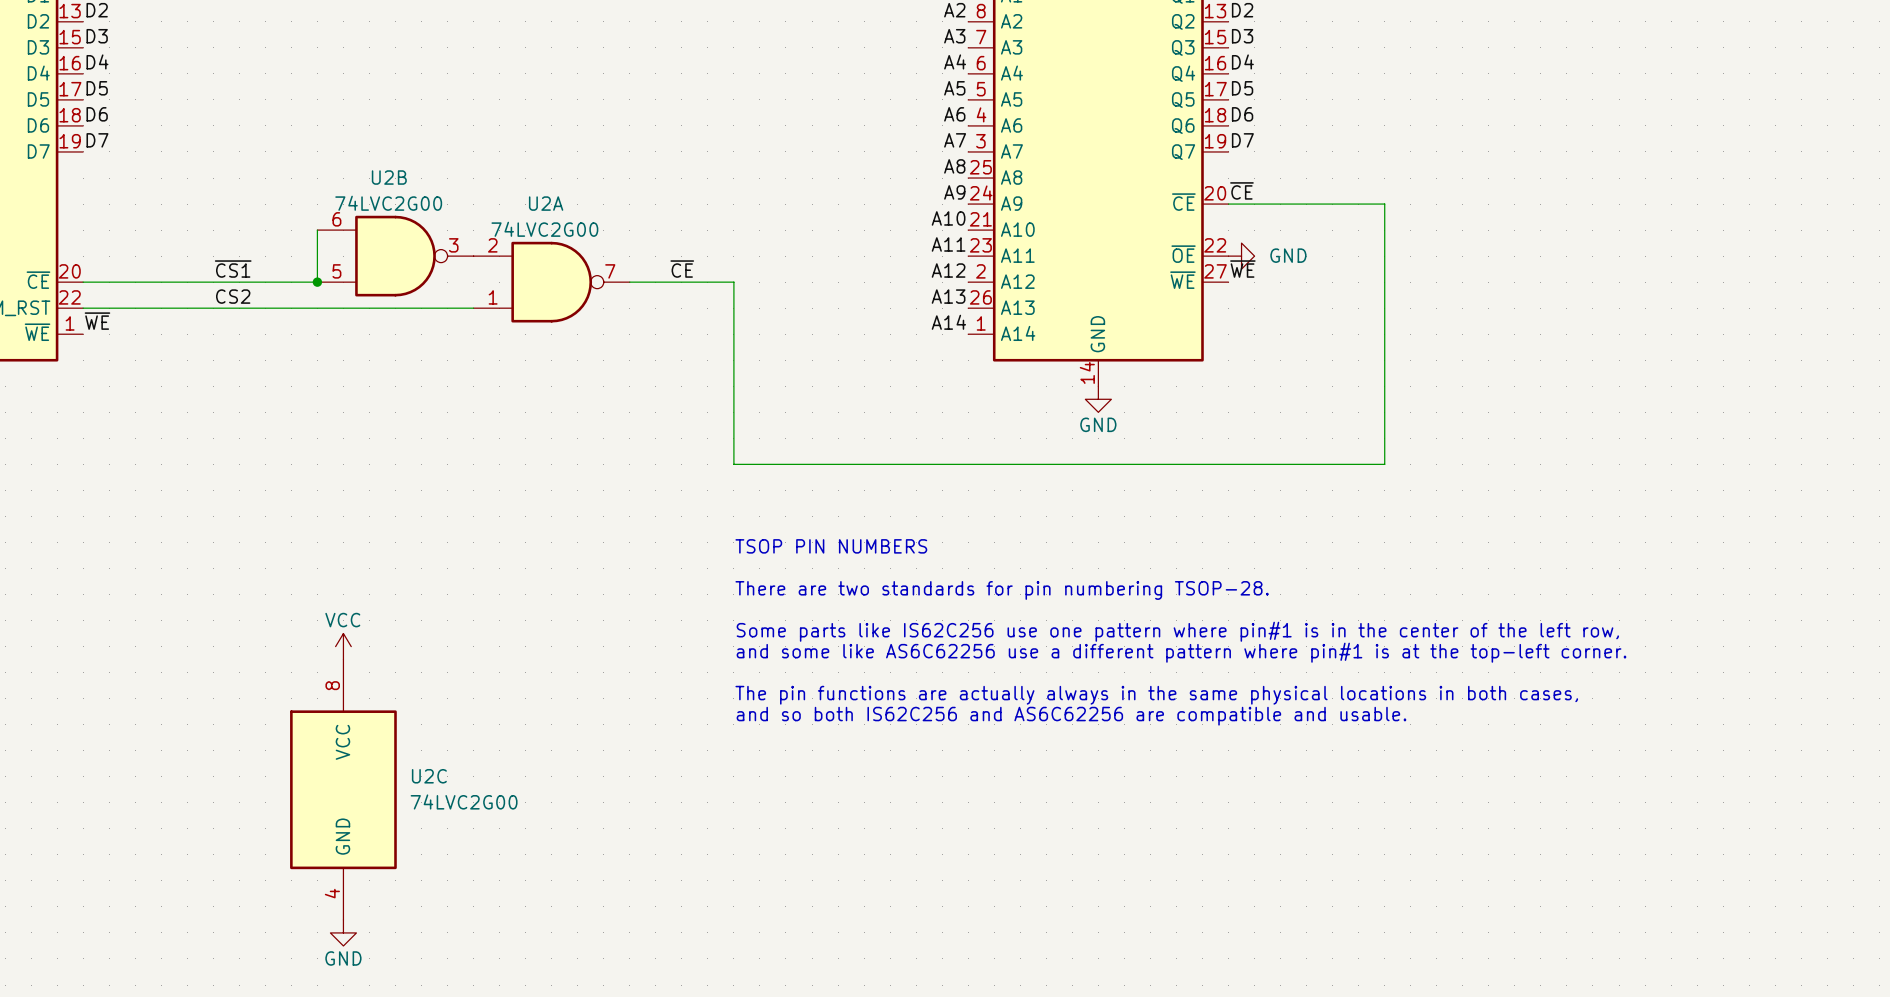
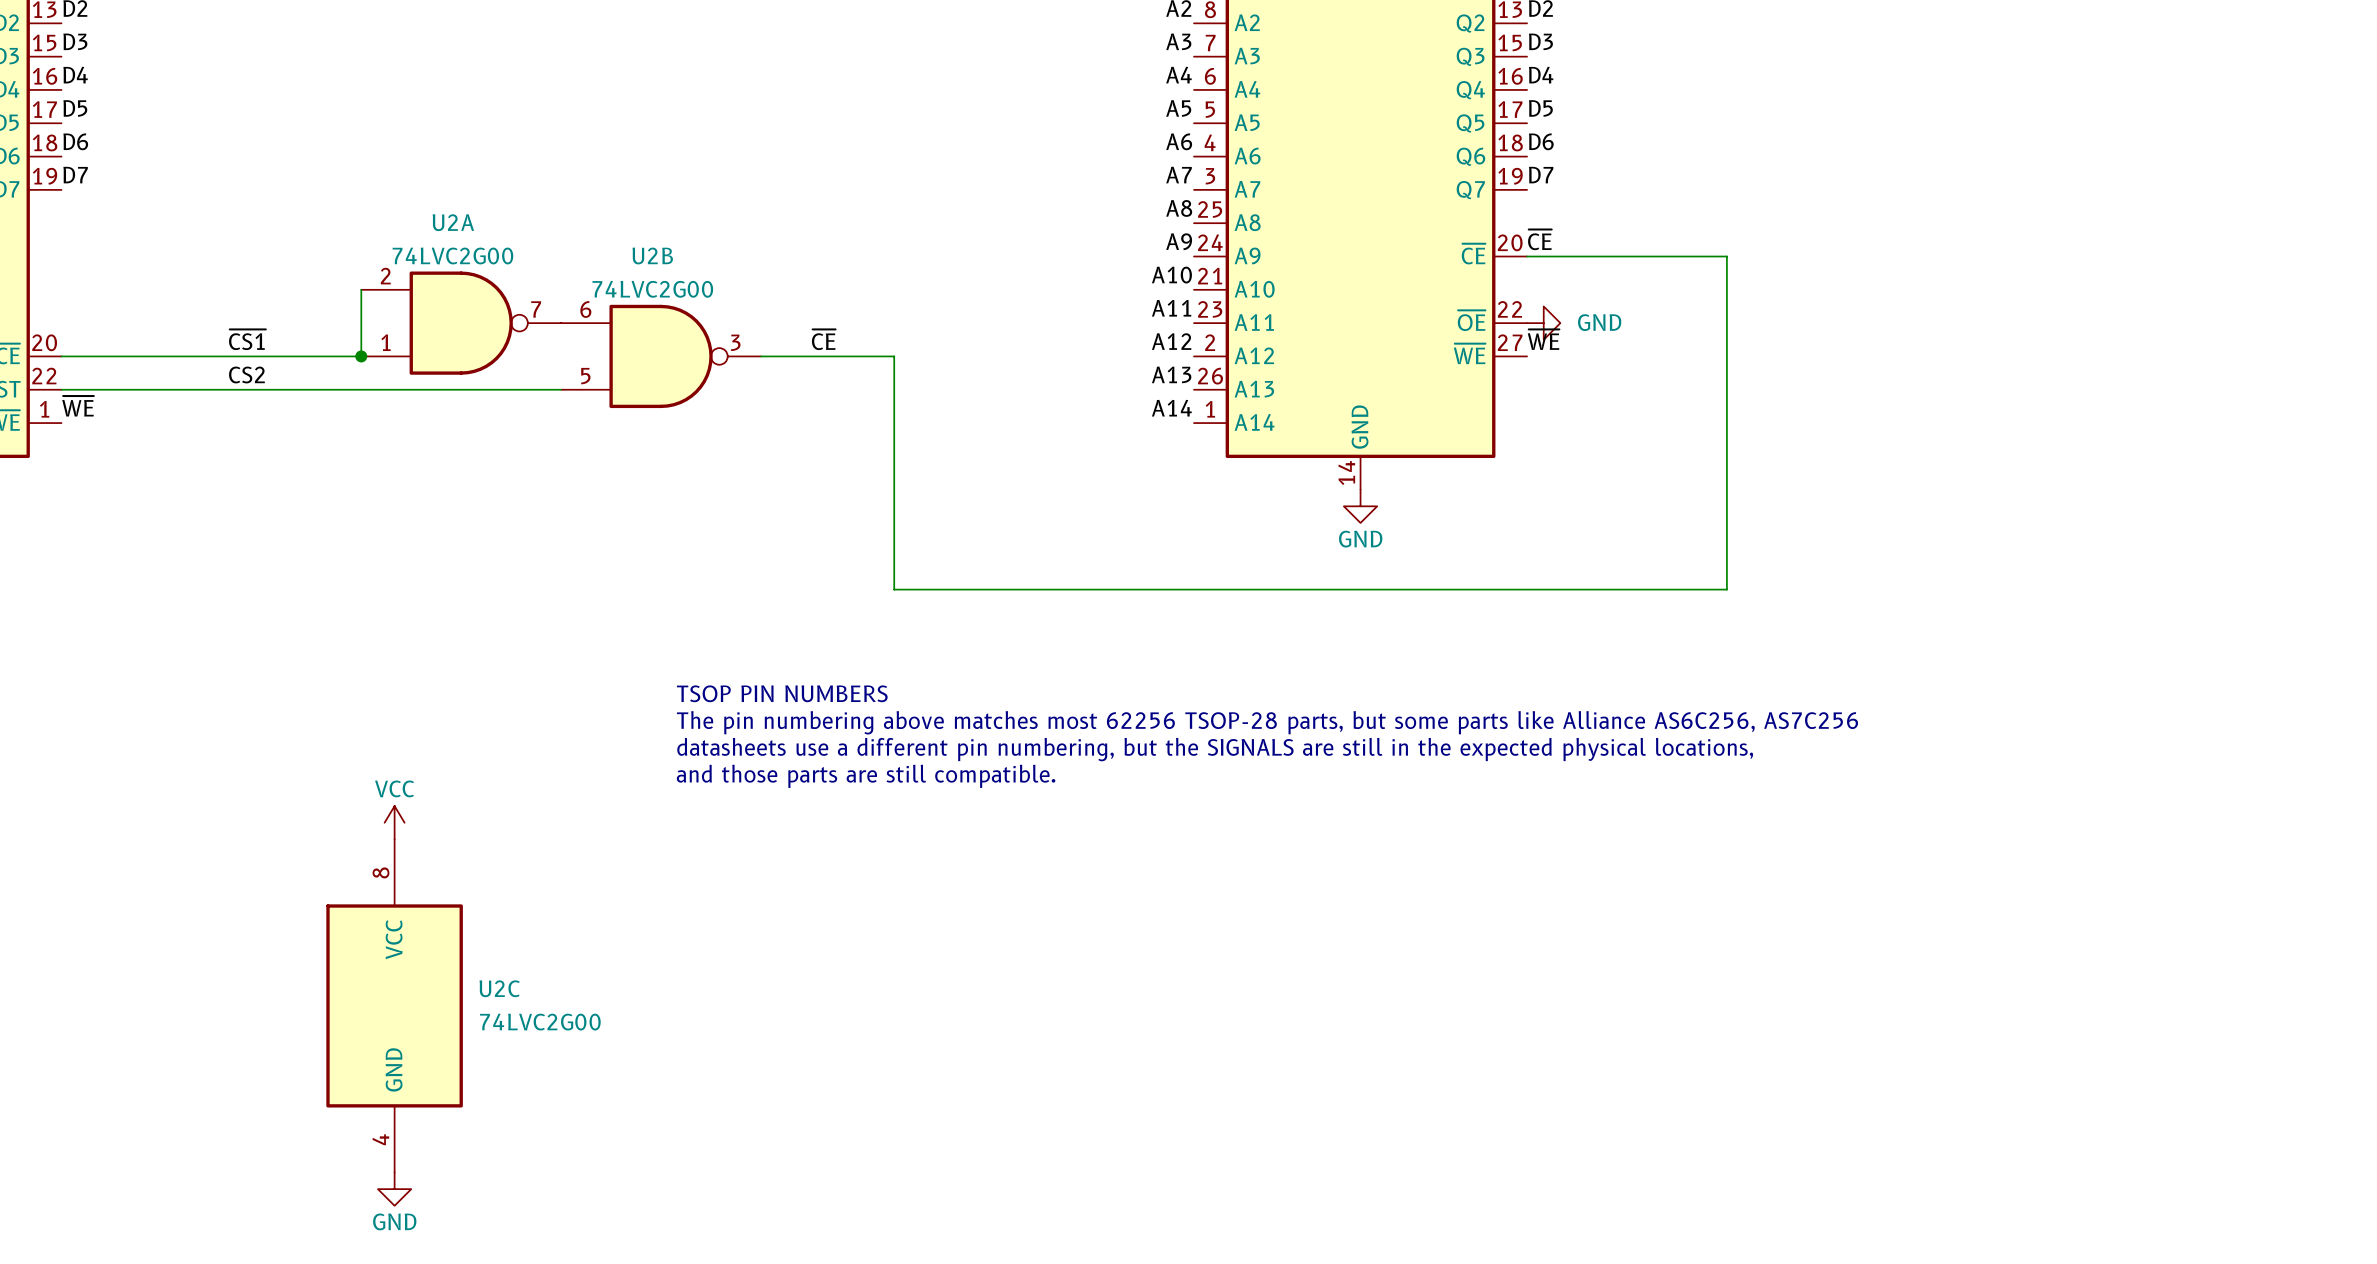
U2B position: (395, 256) -> (661, 356)
U2A position: (551, 282) -> (461, 323)
text position: TSOP PIN NUMBERS (831, 546) -> TSOP PIN NUMBERS (782, 693)
text: none -> The pin numbering above matches most 62256 TSOP-28 parts, but some parts like Alliance AS6C256, AS7C256 (1267, 722)
text: none -> datasheets use a different pin numbering, but the SIGNALS are still in the expected physical locations, (1215, 749)
text: There are two standards for pin numbering TSOP-28. (1002, 590) -> none
text: none -> and those parts are still compatible. (866, 776)
text: Some parts like IS62C256 use one pattern where pin#1 is in the center of the left row, (1177, 631) -> none
text: and some like AS6C62256 use a different pattern where pin#1 is at the top-left corner. (1181, 652) -> none
text: The pin functions are actually always in the same physical locations in both cases, (1156, 695) -> none
text: and so both IS62C256 and AS6C62256 are compatible and usable. (1071, 716) -> none

